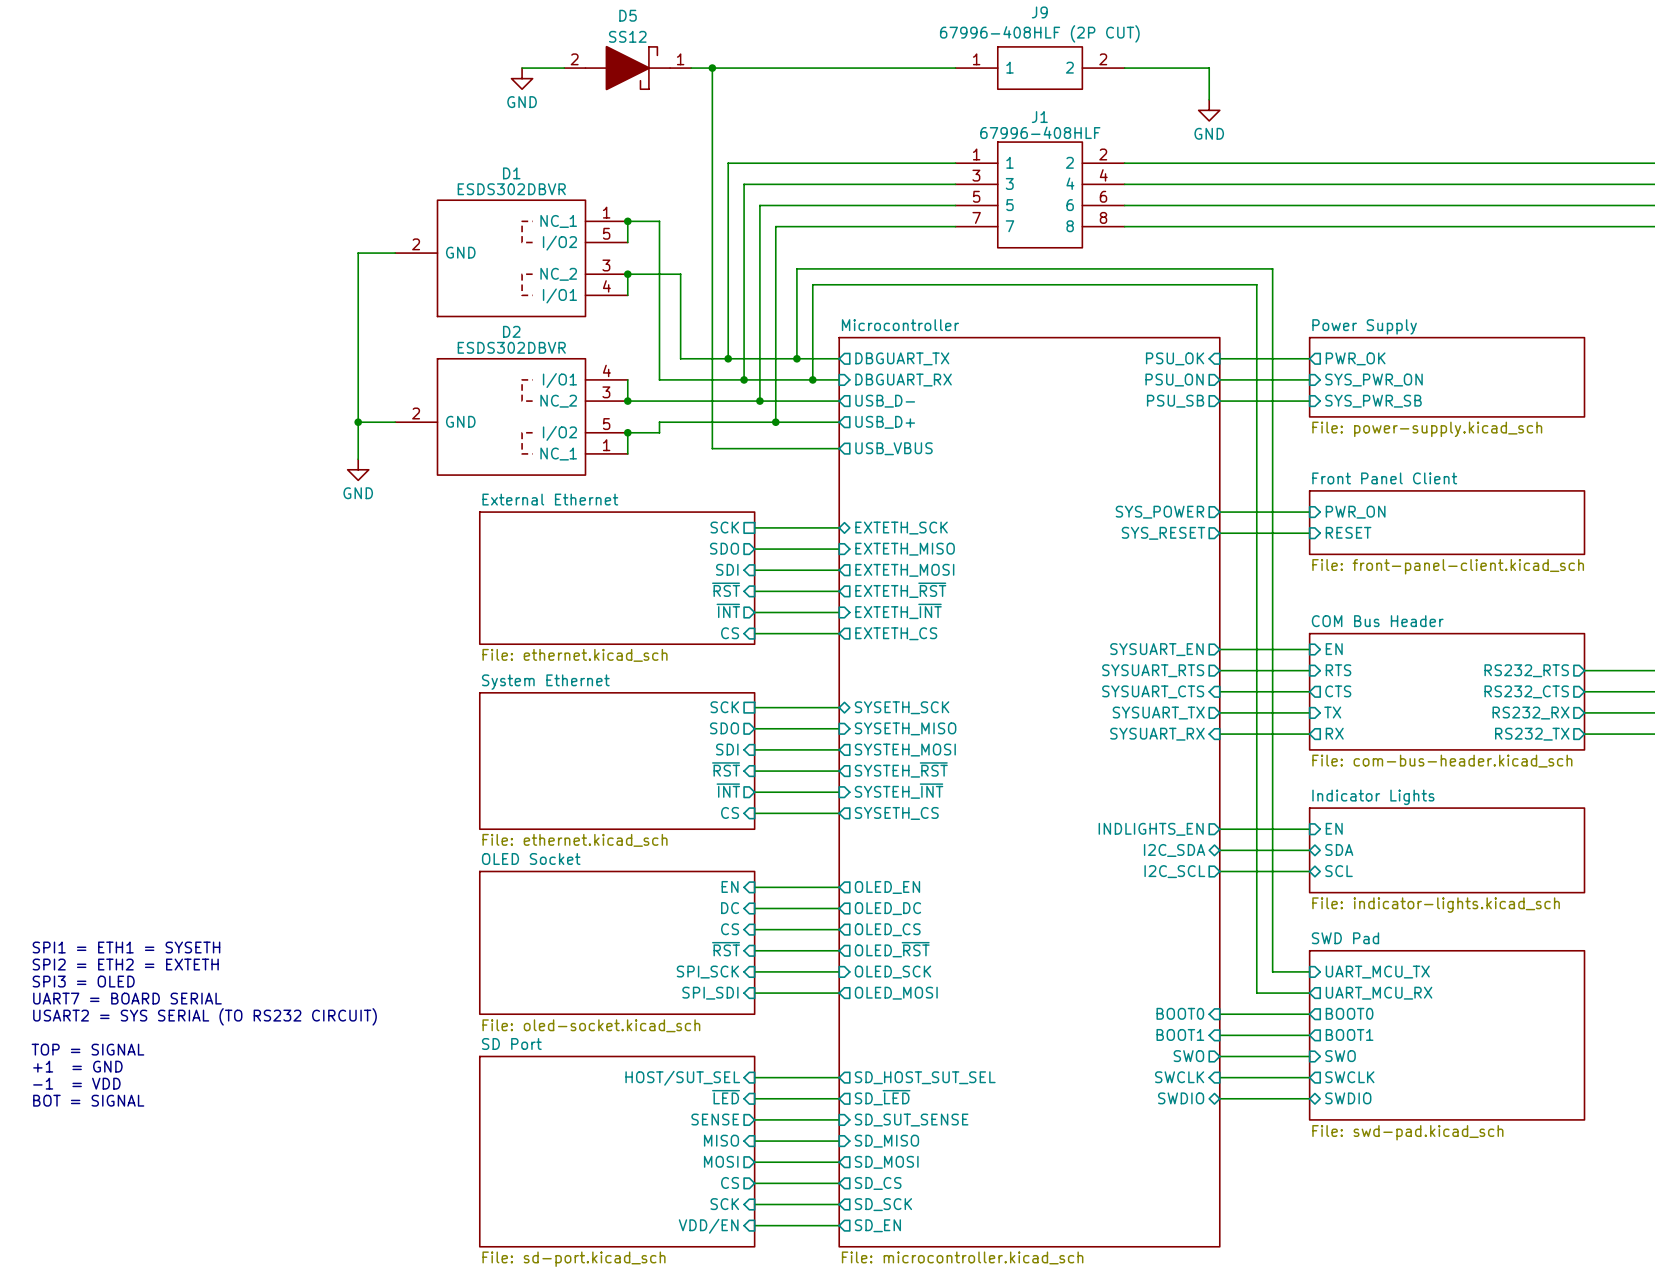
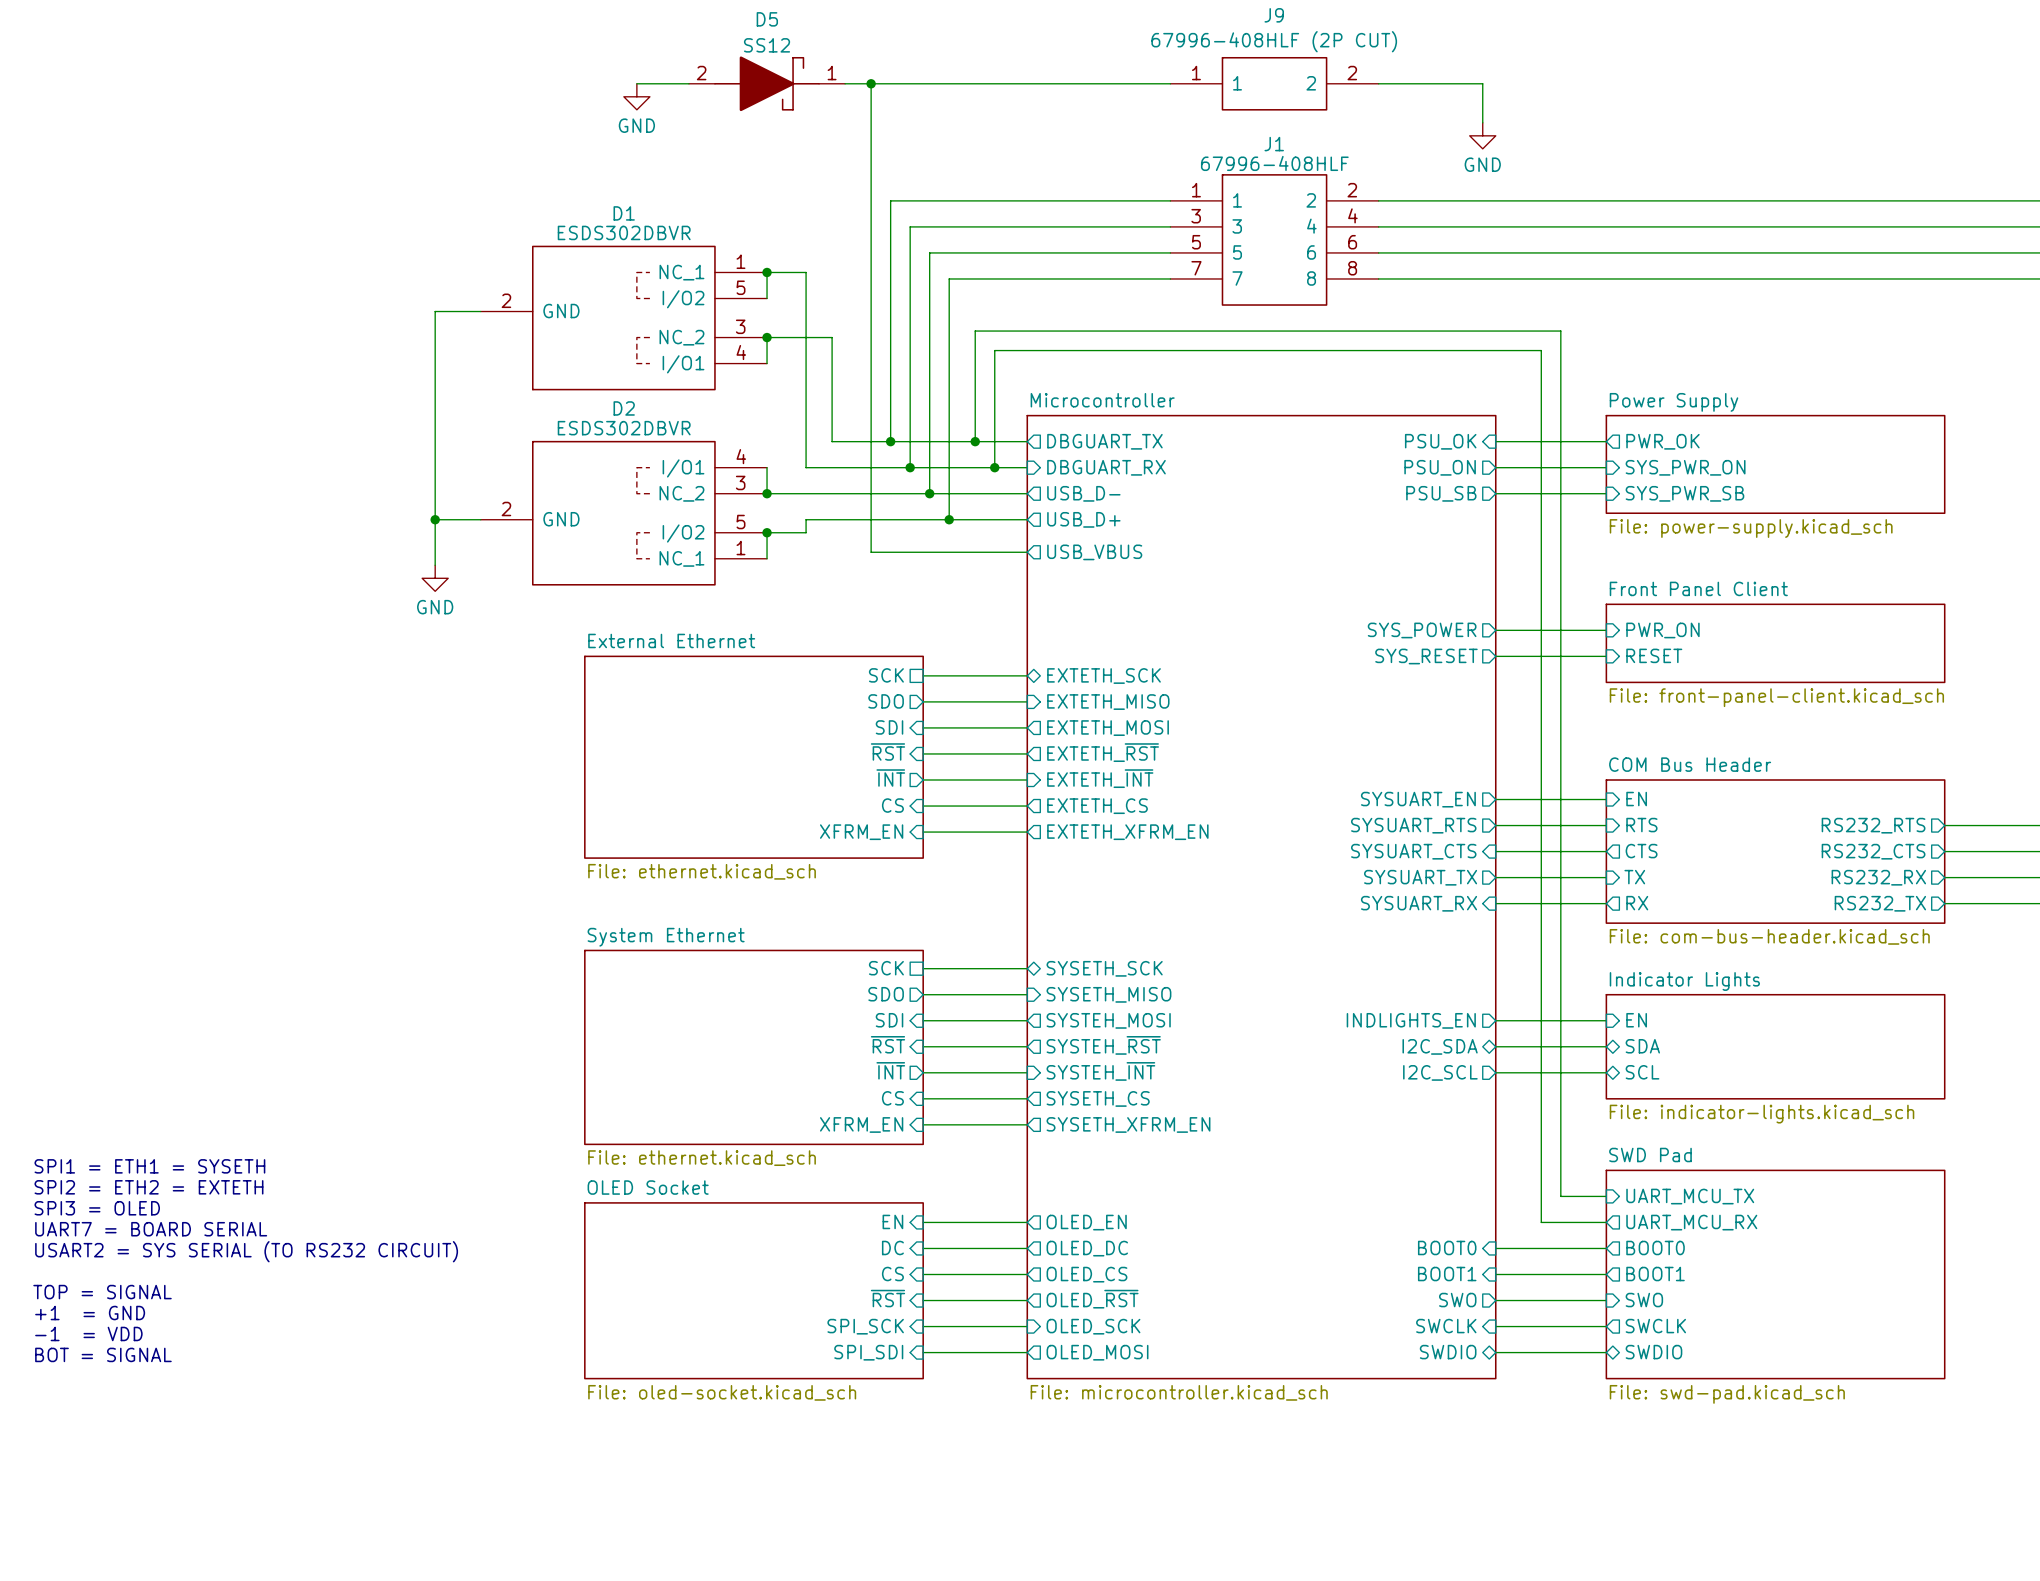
sheet pin: SCK (724, 527) -> none
wire: (754, 527) (839, 527) -> (923, 806) (1027, 806)
sheet pin: EXTETH_SCK (901, 528) -> none
sheet pin shape: output (724, 548) -> passive (886, 675)
sheet pin: SDO (724, 548) -> SCK (886, 675)
sheet pin shape: input (905, 549) -> bidirectional (1104, 676)
sheet pin: EXTETH_MISO (905, 549) -> EXTETH_SCK (1104, 676)
sheet pin shape: input (727, 569) -> output (886, 701)
sheet pin: SDI (727, 569) -> SDO (886, 701)
sheet pin shape: output (904, 570) -> input (1108, 702)
sheet pin: EXTETH_MOSI (904, 570) -> EXTETH_MISO (1108, 702)
sheet External Ethernet: File: ethernet.kicad_sch (617, 578) -> none
sheet pin: ~{RST} (726, 589) -> SDI (889, 727)
sheet pin: EXTETH_~{RST} (900, 590) -> EXTETH_MOSI (1108, 728)
sheet pin shape: output (728, 610) -> input (887, 751)
sheet pin: ~{INT} (728, 610) -> ~{RST} (887, 751)
sheet pin shape: input (898, 611) -> output (1103, 752)
sheet pin: EXTETH_~{INT} (898, 611) -> EXTETH_~{RST} (1103, 752)
sheet External Ethernet: none -> File: ethernet.kicad_sch (754, 757)
sheet pin shape: input (730, 633) -> output (890, 778)
sheet pin: CS (730, 633) -> ~{INT} (890, 778)
sheet pin shape: output (896, 633) -> input (1100, 778)
sheet pin: EXTETH_CS (896, 633) -> EXTETH_~{INT} (1100, 778)
sheet pin: none -> CS (892, 805)
sheet pin: none -> EXTETH_CS (1097, 806)
wire: none -> (923, 832) (1027, 832)
sheet pin: none -> XFRM_EN (861, 832)
sheet pin: none -> EXTETH_XFRM_EN (1127, 832)
sheet pin position: SCK (724, 707) -> SCK (886, 968)
wire: (754, 707) (839, 707) -> (923, 968) (1027, 968)
sheet pin position: SYSETH_SCK (902, 707) -> SYSETH_SCK (1104, 968)
sheet pin position: SDO (724, 728) -> SDO (886, 994)
wire: (754, 728) (839, 728) -> (923, 994) (1027, 994)
sheet pin position: SYSETH_MISO (905, 728) -> SYSETH_MISO (1108, 994)
sheet Microcontroller: none -> File: microcontroller.kicad_sch (1261, 897)
sheet pin position: SDI (727, 749) -> SDI (889, 1020)
wire: (754, 749) (839, 749) -> (923, 1020) (1027, 1020)
sheet pin position: SYSTEH_MOSI (905, 750) -> SYSTEH_MOSI (1108, 1020)
sheet System Ethernet: File: ethernet.kicad_sch (617, 761) -> none
sheet pin: ~{RST} (726, 769) -> none
sheet pin position: SYSTEH_~{RST} (901, 769) -> SYSTEH_~{RST} (1103, 1045)
wire: (754, 771) (839, 771) -> (923, 1046) (1027, 1046)
sheet pin position: ~{INT} (728, 790) -> ~{INT} (890, 1070)
sheet pin position: SYSTEH_~{INT} (899, 791) -> SYSTEH_~{INT} (1100, 1071)
wire: (754, 792) (839, 792) -> (923, 1072) (1027, 1072)
sheet Microcontroller: File: microcontroller.kicad_sch (1029, 792) -> none
sheet pin: CS (730, 812) -> none
wire: (754, 813) (839, 813) -> (923, 1098) (1027, 1098)
sheet pin position: SYSETH_CS (896, 813) -> SYSETH_CS (1098, 1098)
sheet pin: none -> ~{RST} (887, 1044)
sheet System Ethernet: none -> File: ethernet.kicad_sch (754, 1047)
sheet pin: EN (730, 886) -> none
wire: (754, 887) (839, 887) -> (923, 1248) (1027, 1248)
sheet pin: OLED_EN (887, 887) -> none
sheet pin position: DC (730, 908) -> DC (892, 1247)
wire: (754, 908) (839, 908) -> (923, 1274) (1027, 1274)
sheet pin position: OLED_DC (887, 908) -> OLED_DC (1087, 1248)
sheet pin: none -> XFRM_EN (861, 1124)
sheet pin: none -> SYSETH_XFRM_EN (1128, 1124)
sheet pin position: CS (730, 929) -> CS (892, 1098)
wire: (754, 929) (839, 929) -> (923, 1300) (1027, 1300)
sheet pin position: OLED_CS (887, 929) -> OLED_CS (1086, 1274)
sheet OLED Socket position: (617, 942) -> (754, 1290)
sheet pin: ~{RST} (726, 949) -> none
sheet pin position: OLED_~{RST} (892, 949) -> OLED_~{RST} (1092, 1299)
wire: (754, 950) (839, 950) -> none
wire: (754, 971) (839, 971) -> (923, 1124) (1027, 1124)
sheet pin: SPI_SCK (707, 972) -> none
sheet pin: OLED_SCK (892, 972) -> none
sheet pin: SPI_SDI (710, 993) -> EN (892, 1221)
sheet pin: OLED_MOSI (896, 993) -> OLED_EN (1086, 1222)
sheet pin: none -> CS (892, 1274)
sheet pin: none -> ~{RST} (887, 1298)
sheet pin shape: output (925, 1077) -> input (1093, 1326)
sheet pin: SD_HOST_SUT_SEL (925, 1077) -> OLED_SCK (1093, 1326)
sheet pin: HOST/SUT_SEL (682, 1078) -> SPI_SCK (865, 1326)
sheet pin: ~{LED} (726, 1097) -> SPI_SDI (868, 1352)
sheet pin: SD_~{LED} (882, 1097) -> OLED_MOSI (1097, 1352)
sheet pin: SENSE (715, 1119) -> none
wire: (754, 1119) (839, 1119) -> none
sheet pin: SD_SUT_SENSE (911, 1120) -> none
sheet pin: MISO (721, 1140) -> none
wire: (754, 1141) (839, 1141) -> none
sheet pin: SD_MISO (886, 1141) -> none
sheet SD Port: File: sd-port.kicad_sch (617, 1151) -> none
sheet pin: MOSI (721, 1161) -> none
wire: (754, 1162) (839, 1162) -> none
sheet pin: SD_MOSI (886, 1162) -> none
sheet pin: CS (730, 1182) -> none
wire: (754, 1183) (839, 1183) -> none
sheet pin: SD_CS (878, 1183) -> none
sheet pin: SCK (724, 1204) -> none
wire: (754, 1204) (839, 1204) -> none
sheet pin: SD_SCK (883, 1204) -> none
wire: (754, 1225) (839, 1225) -> none
sheet pin: SD_EN (877, 1225) -> none
sheet pin: VDD/EN (708, 1226) -> none

